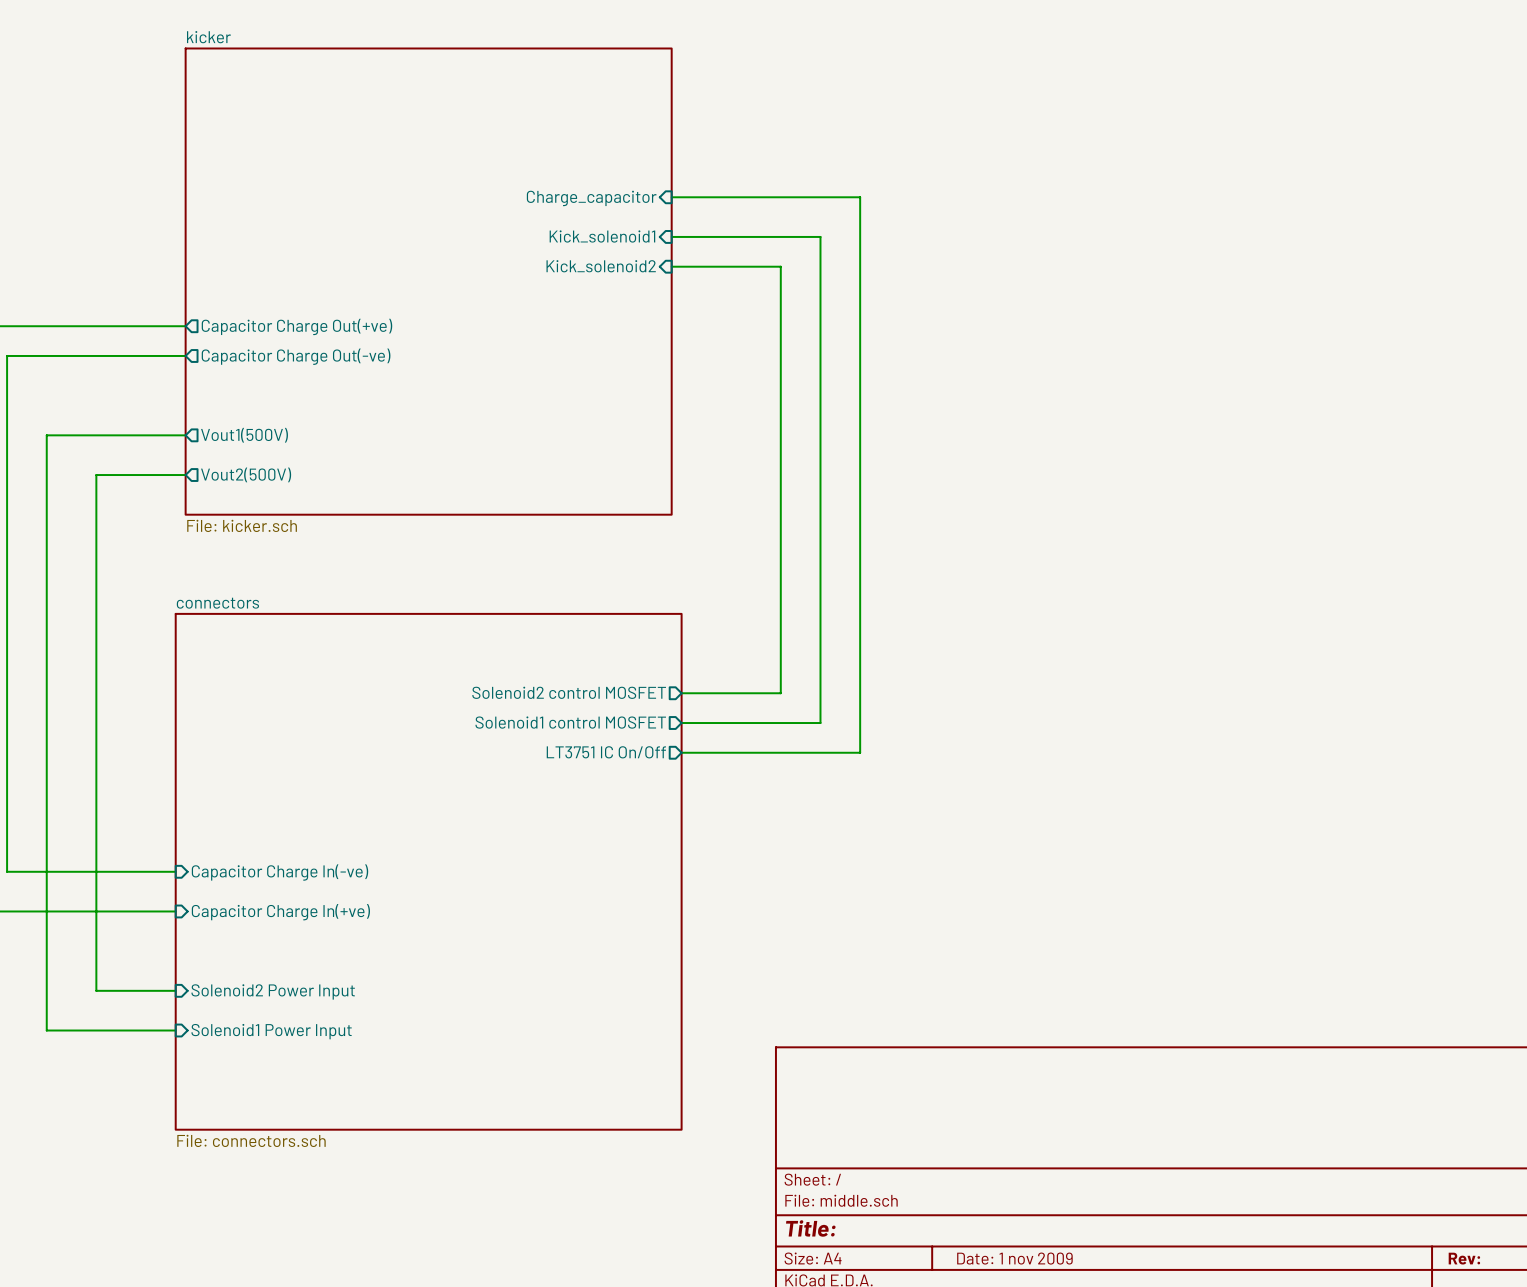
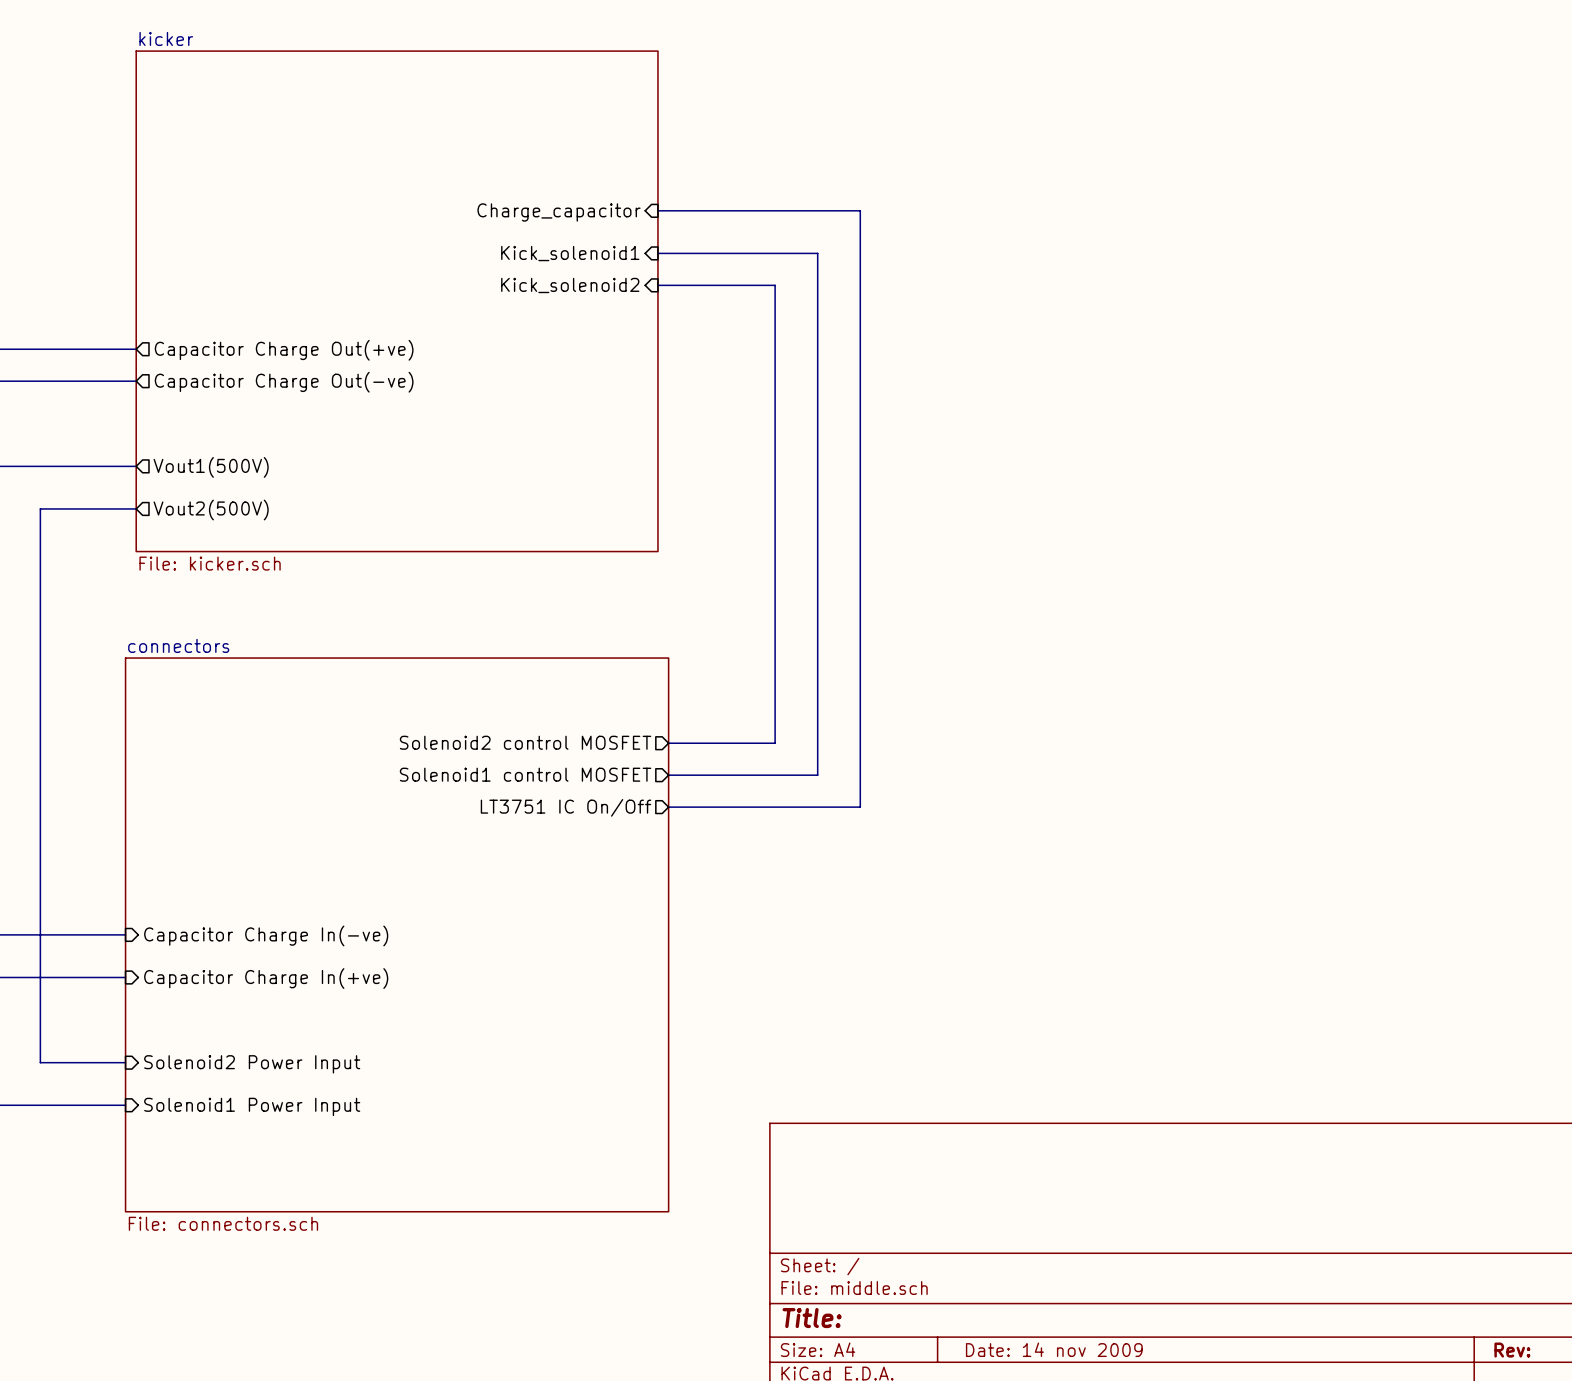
title block: Date: 1 nov 2009 (1014, 1258) -> Date: 14 nov 2009 (1054, 1349)

